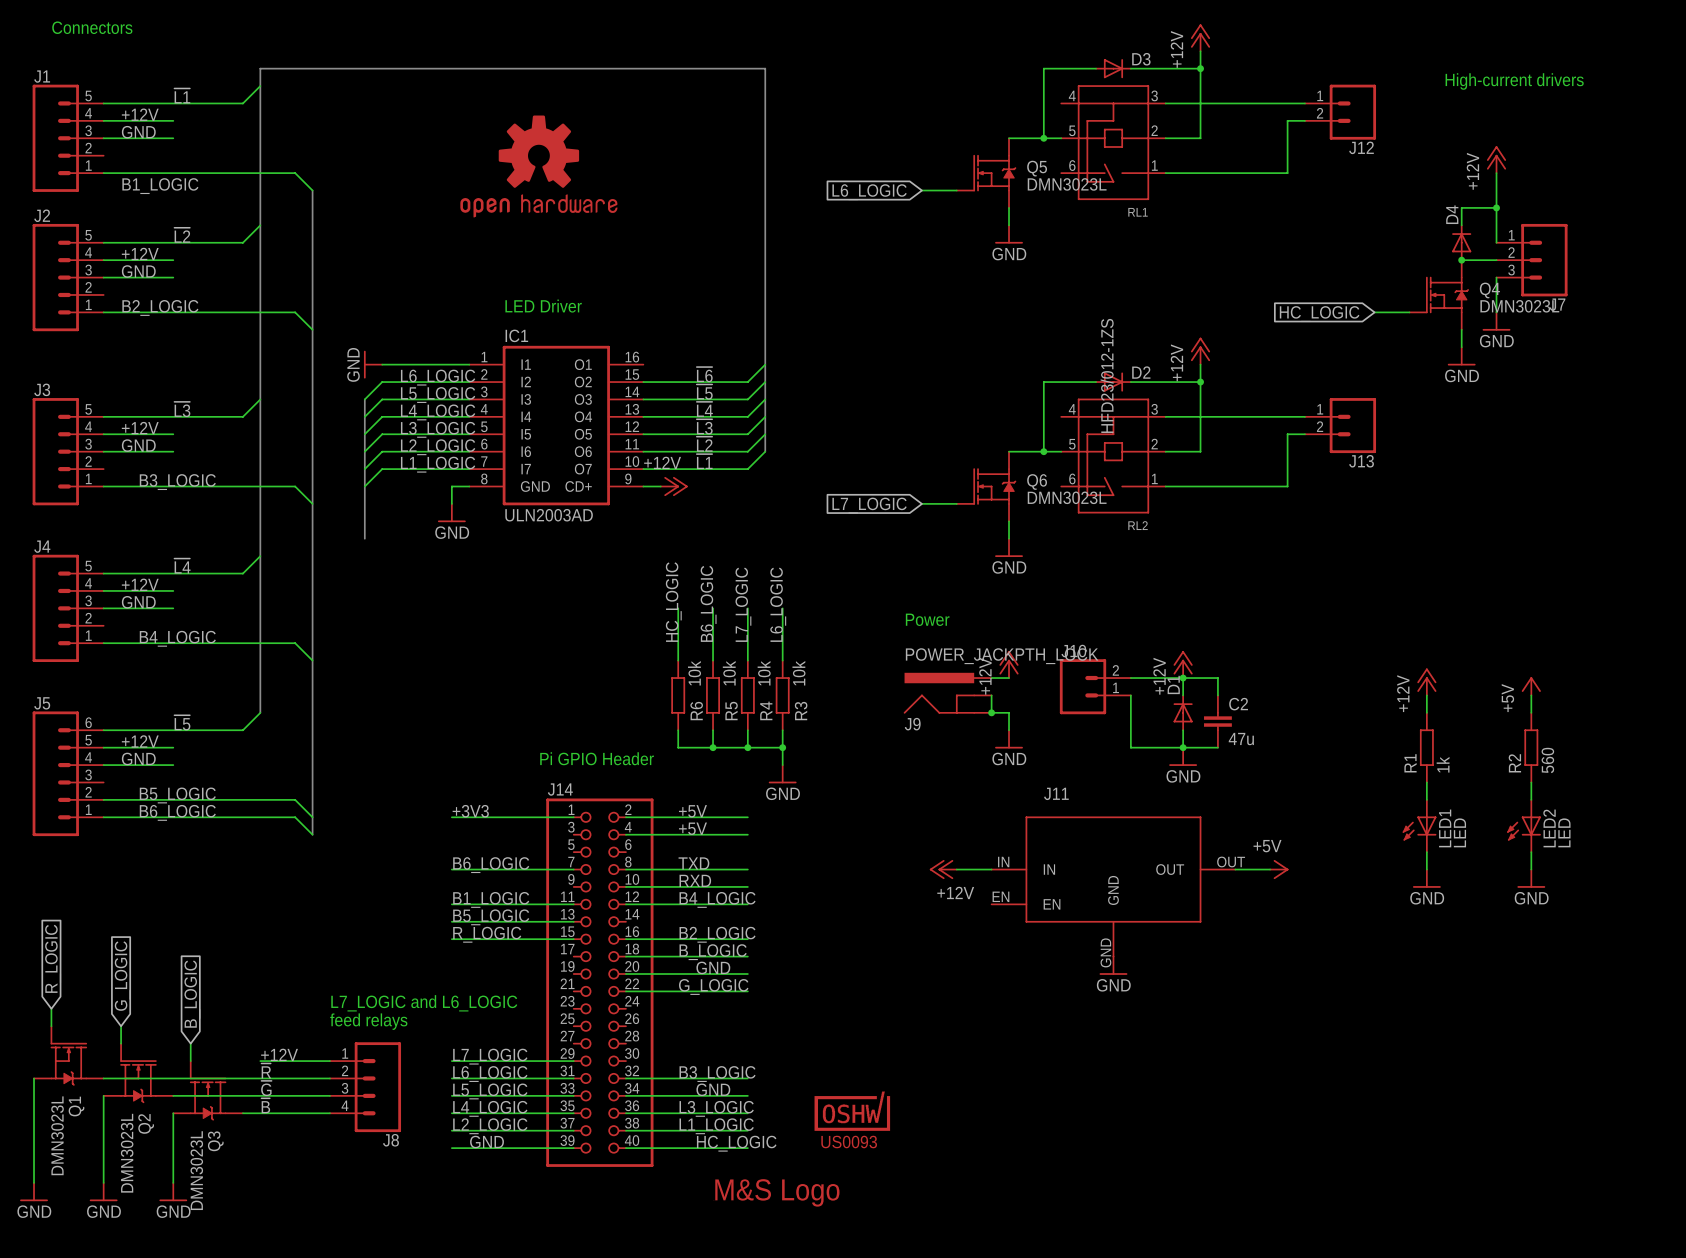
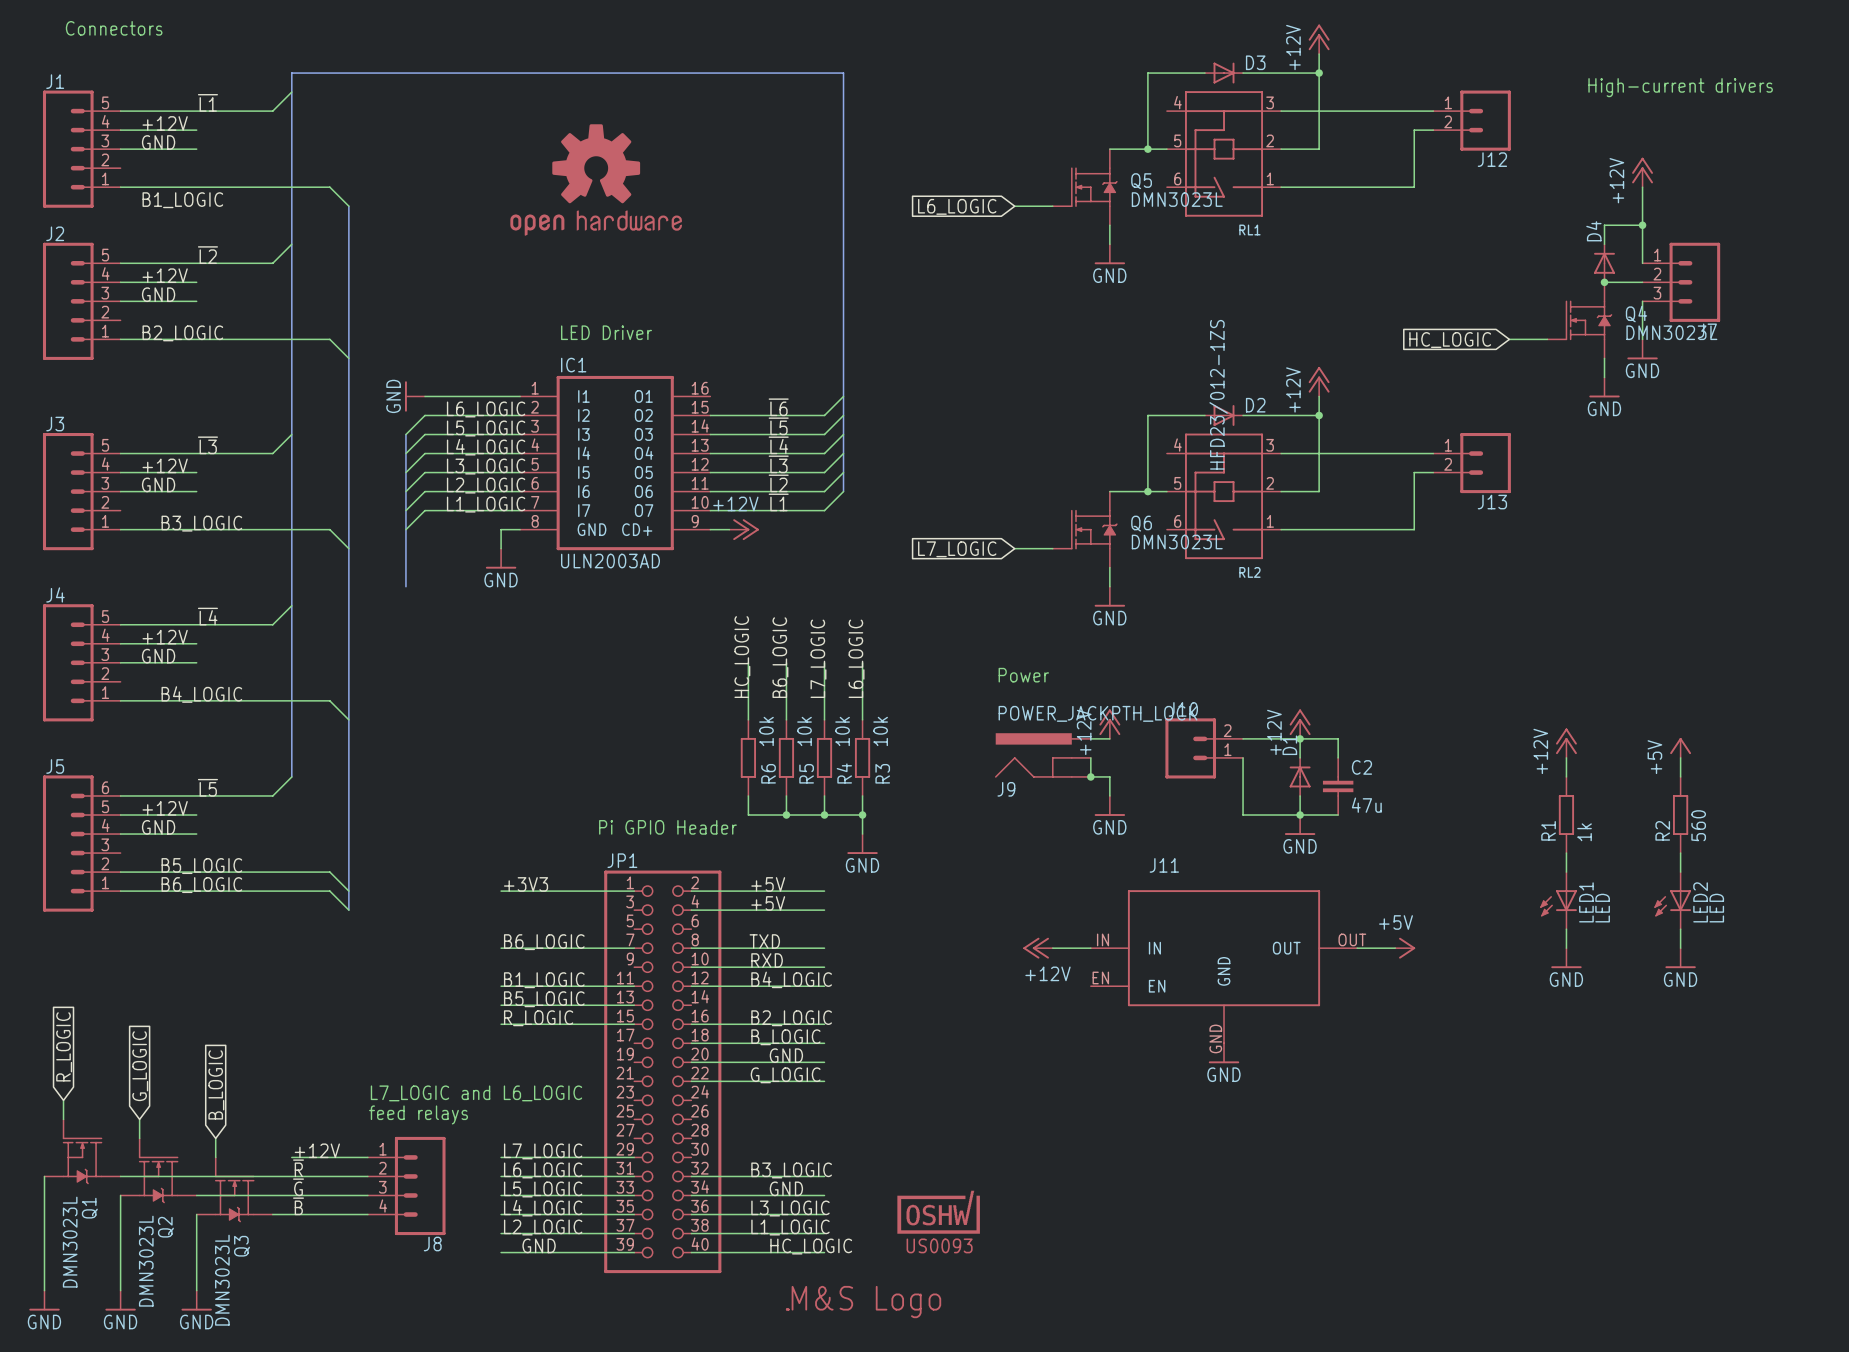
J14 name: J14 (560, 789) -> JP1 (622, 860)

